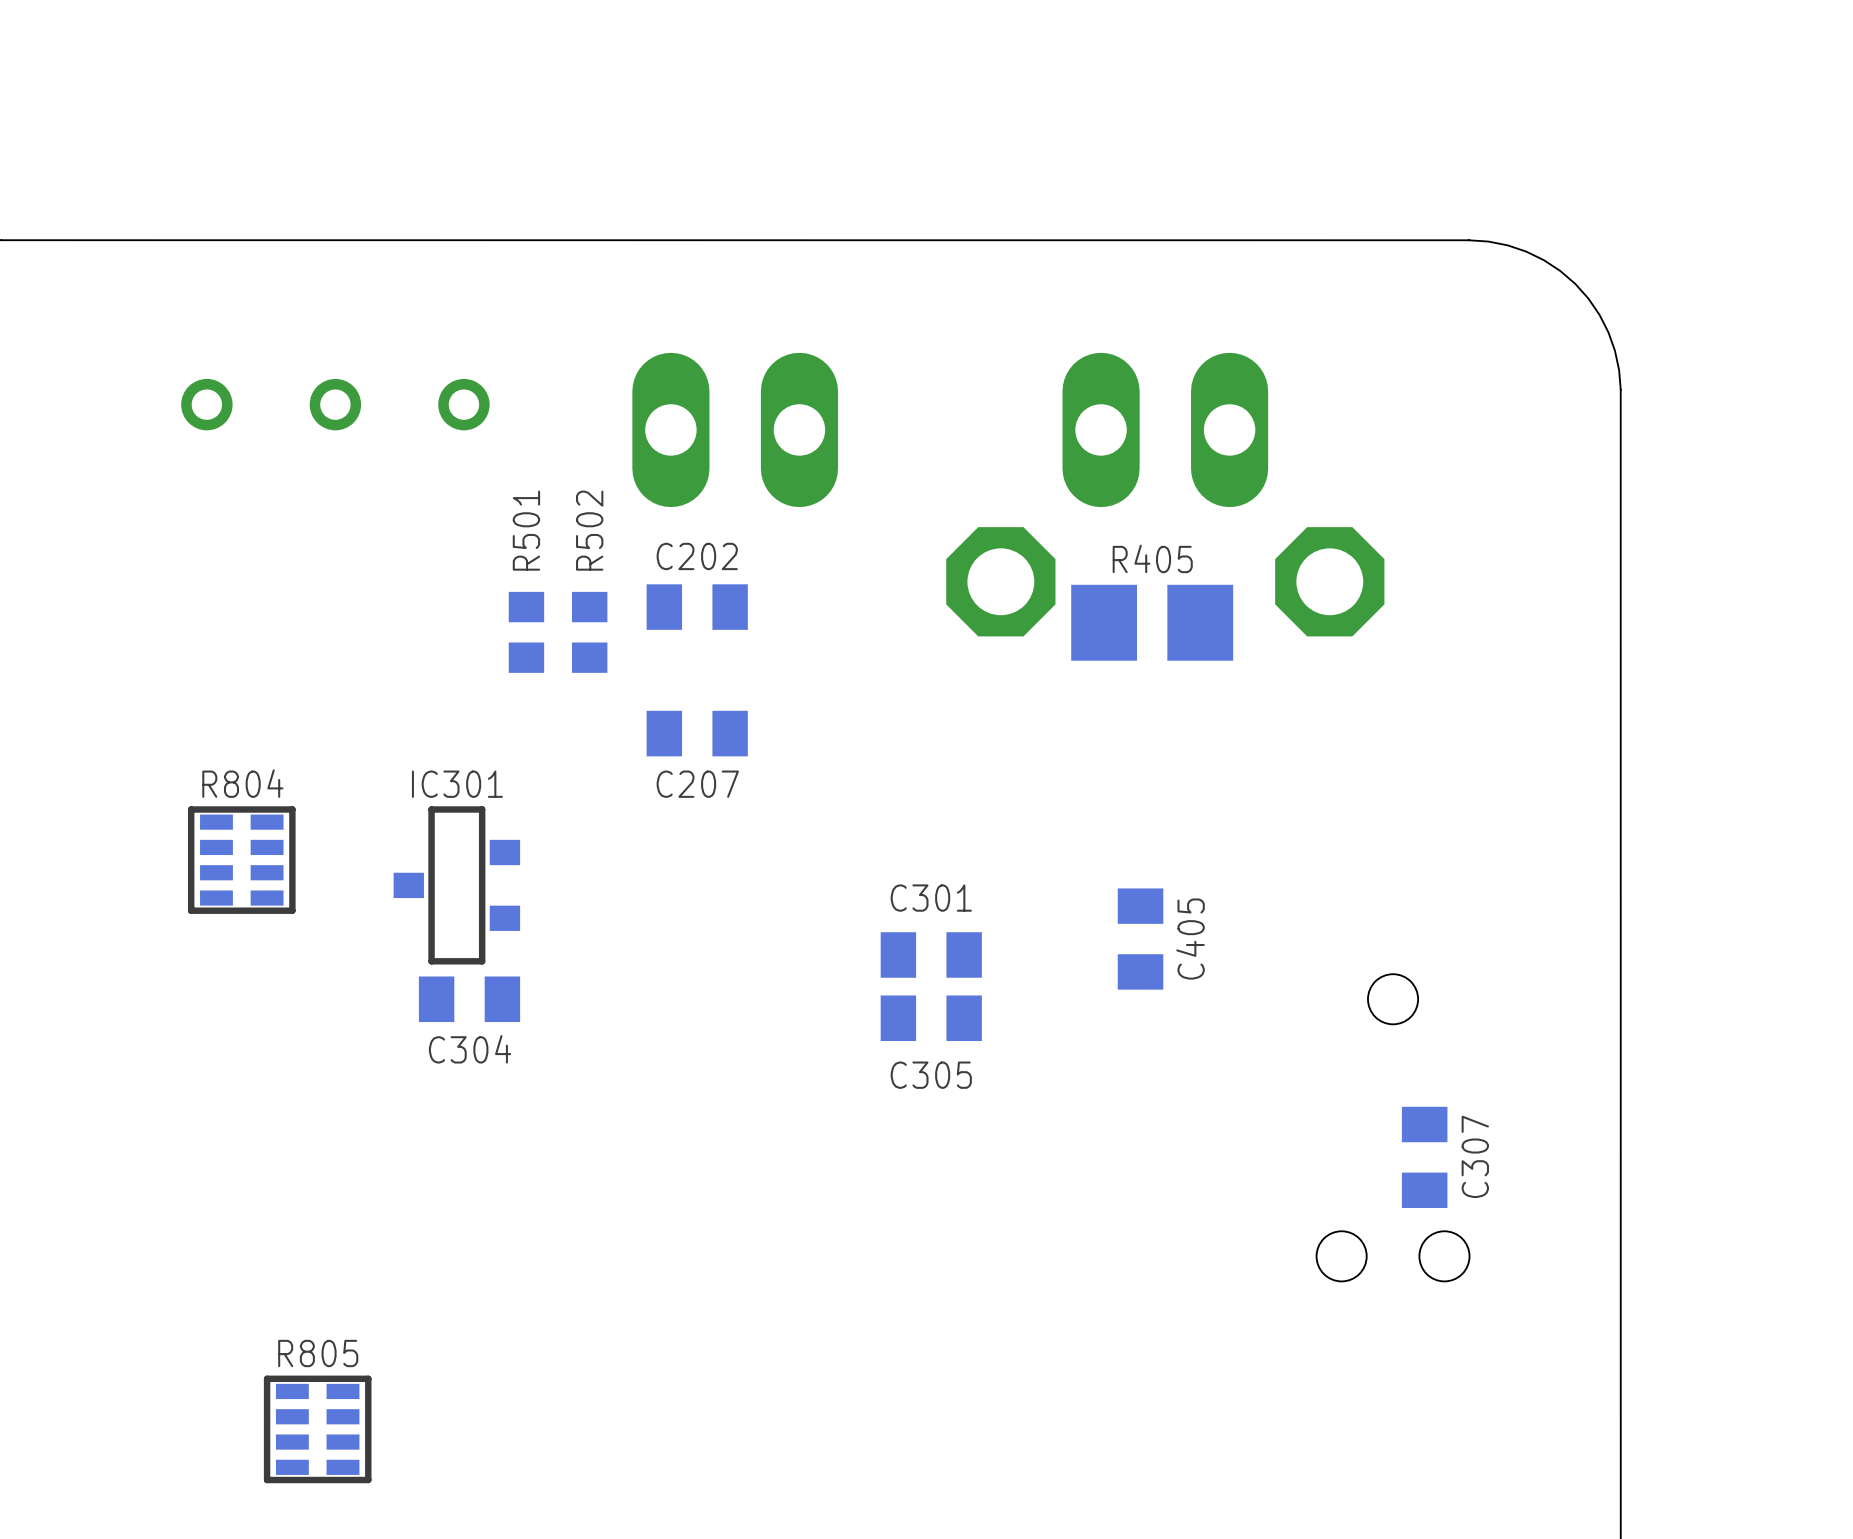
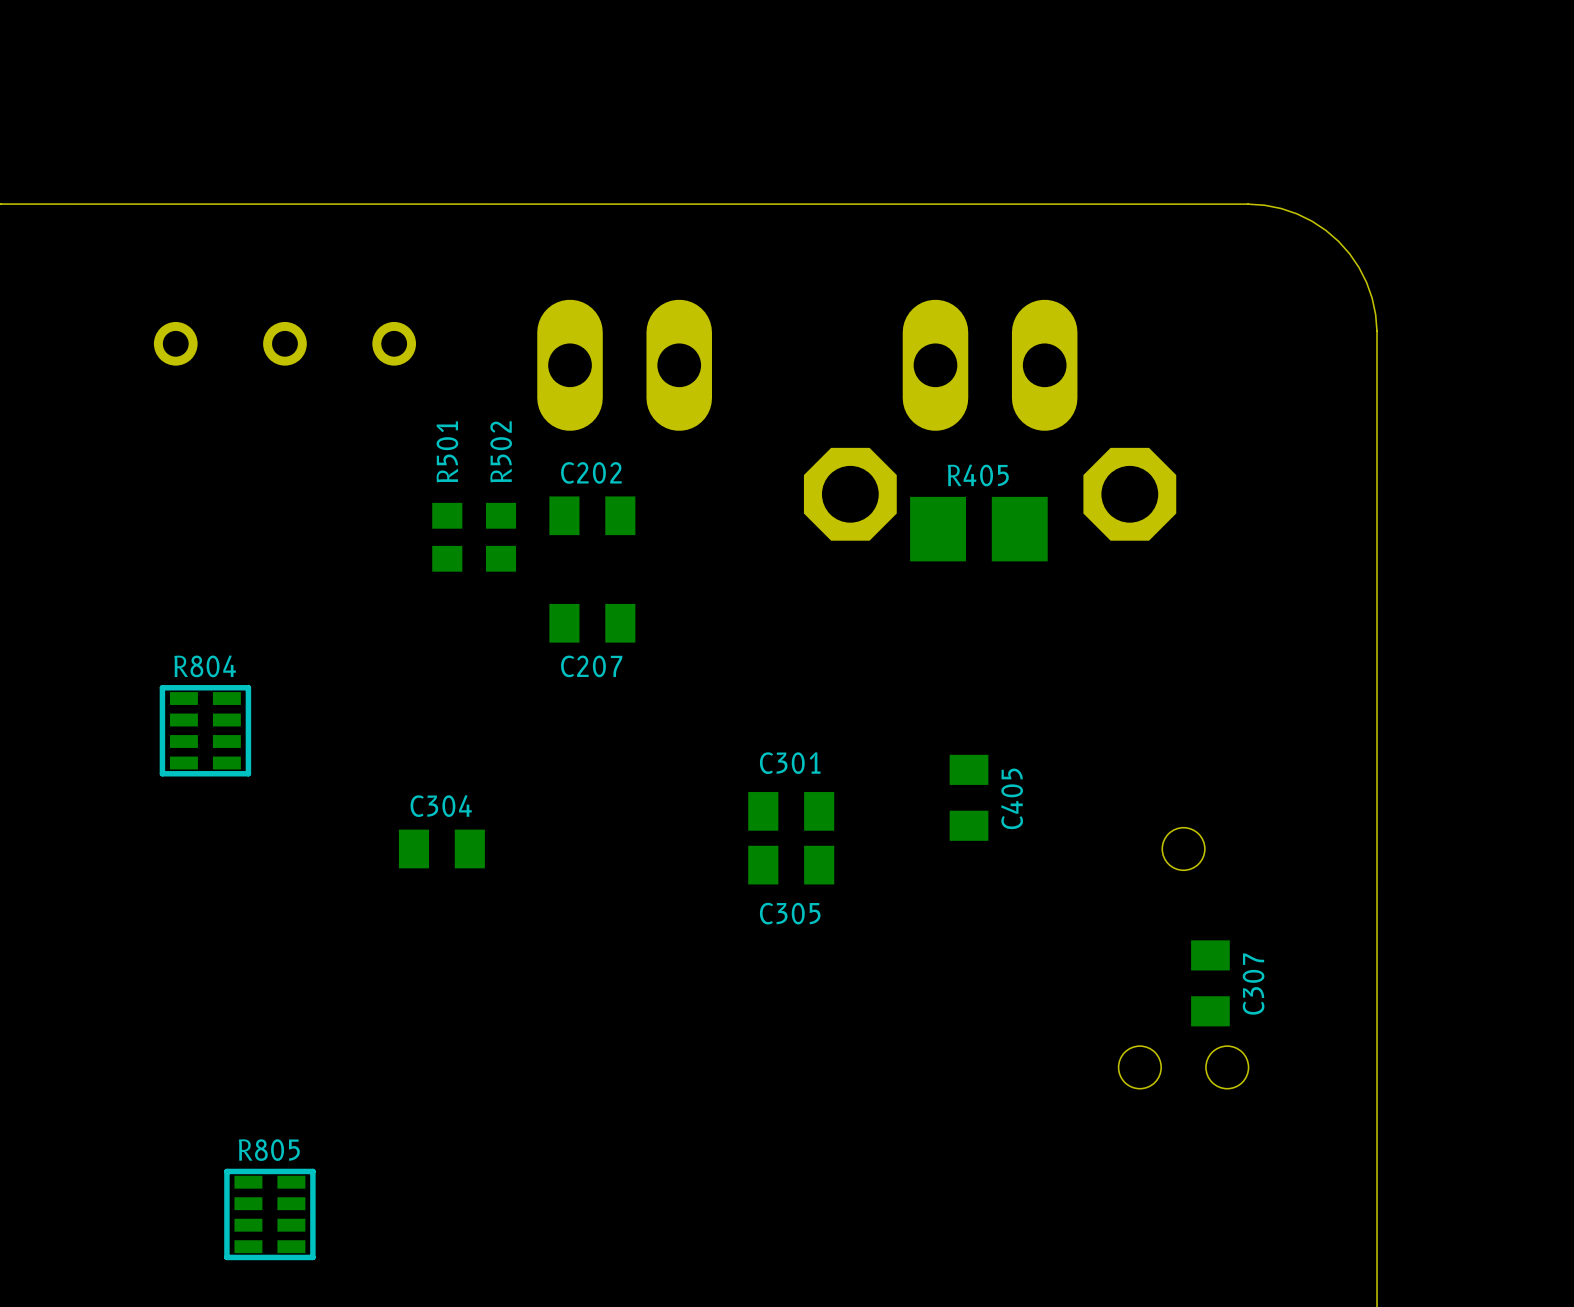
IC301: (456, 885) -> none
C304 position: (469, 999) -> (441, 848)
C304 name position: C304 (470, 1049) -> C304 (441, 806)

